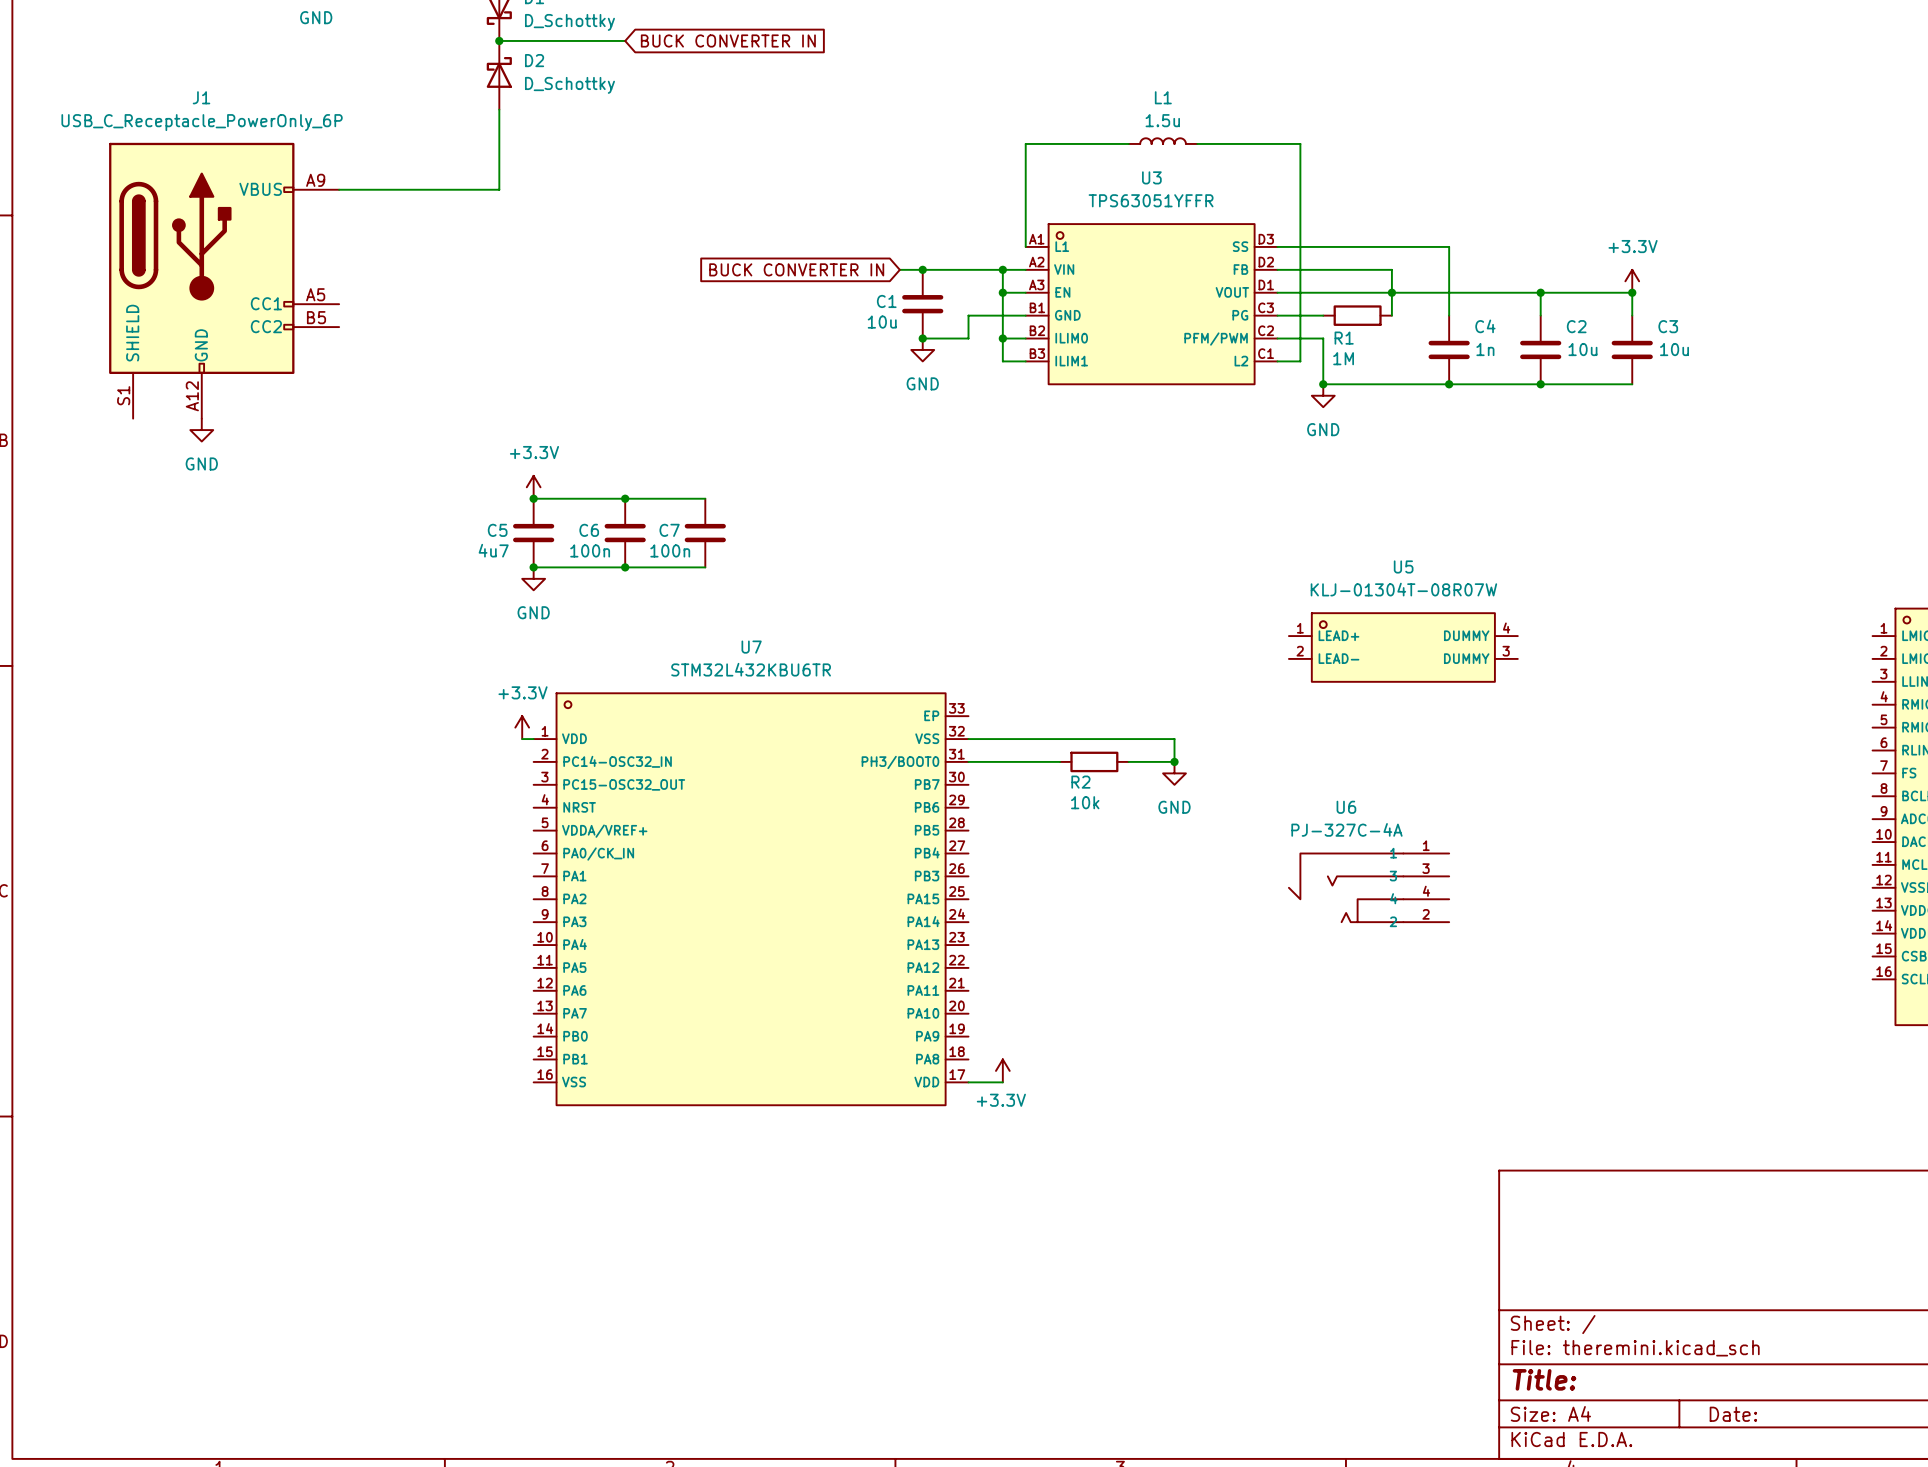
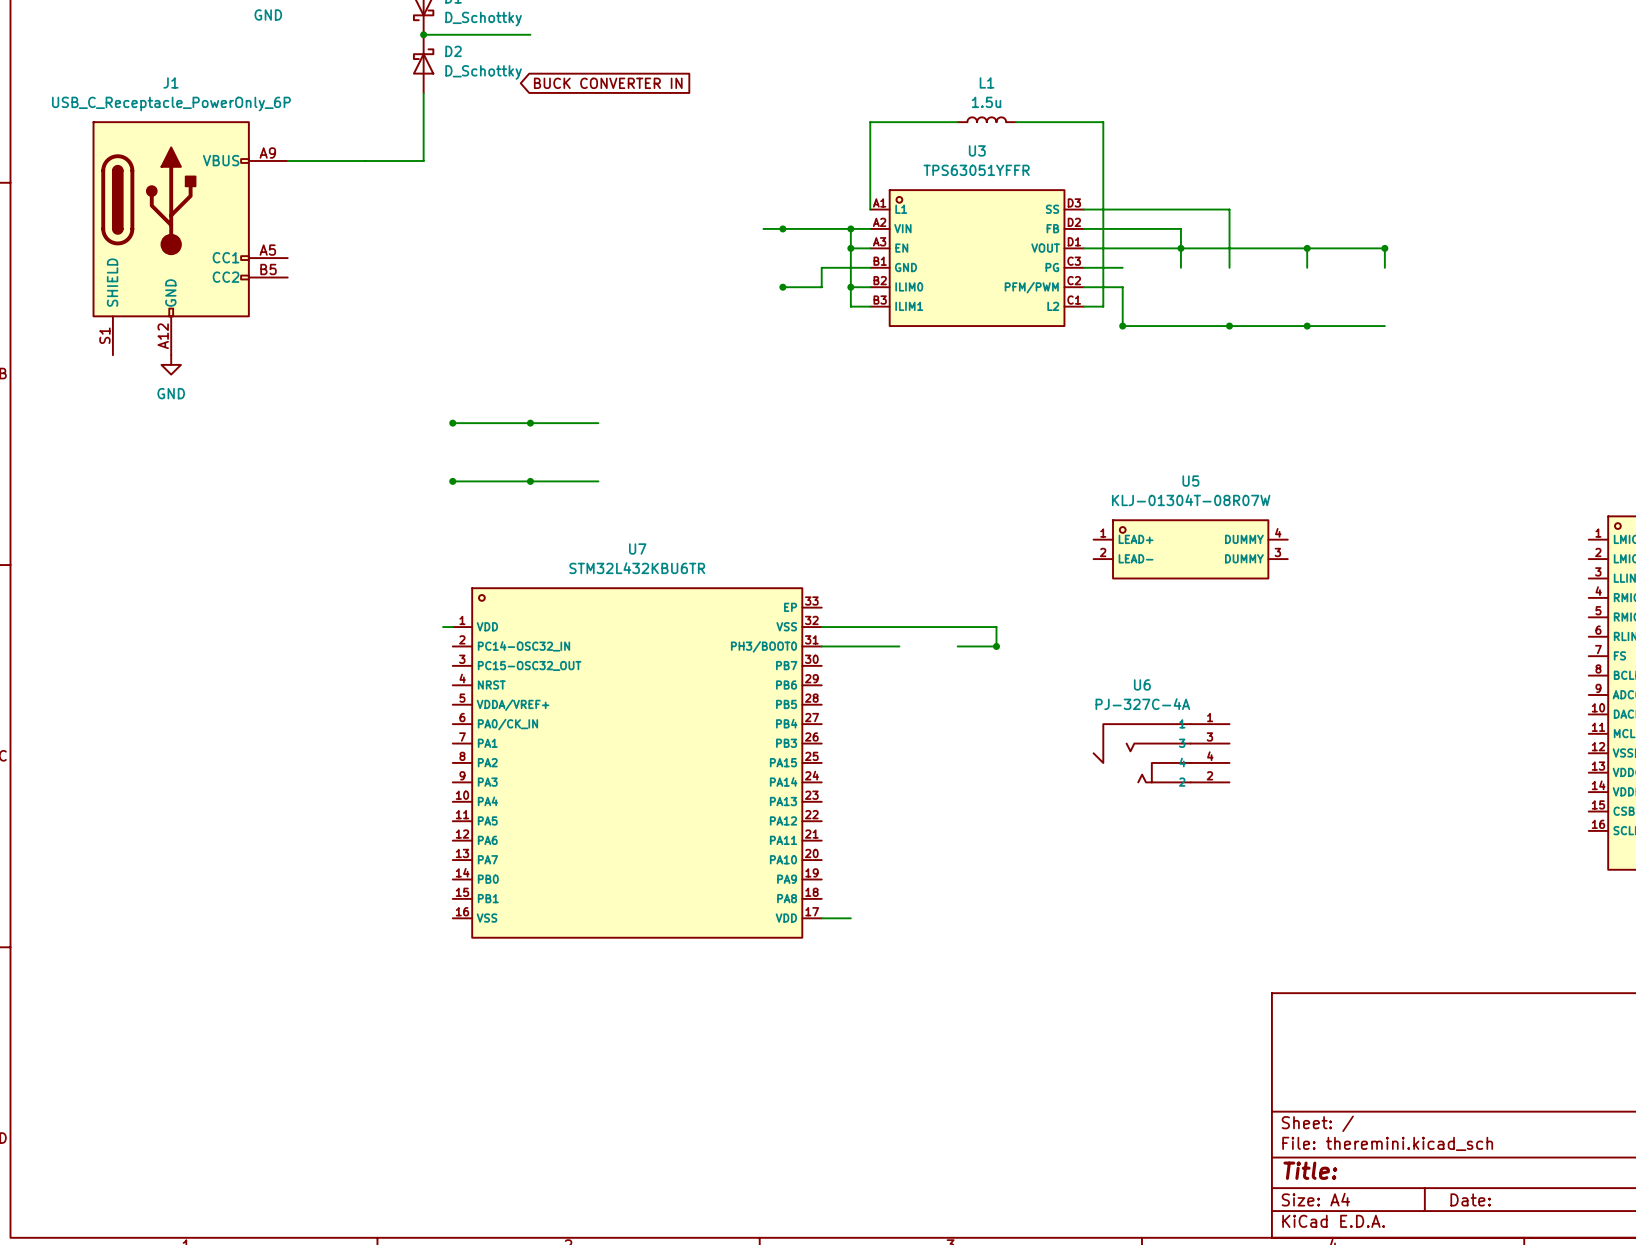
global label position: BUCK CONVERTER IN (728, 40) -> BUCK CONVERTER IN (608, 83)
global label: BUCK CONVERTER IN (796, 269) -> none
power symbol: +3.3V (1632, 281) -> none
C1: 10u (922, 304) -> none
R1: 1M (1357, 315) -> none
power symbol: GND (922, 349) -> none
C4: 1n (1449, 349) -> none
C2: 10u (1540, 349) -> none
C3: 10u (1632, 349) -> none
power symbol: GND (1323, 395) -> none
power symbol: +3.3V (533, 487) -> none
C5: 4u7 (533, 533) -> none
C6: 100n (625, 533) -> none
C7: 100n (705, 533) -> none
power symbol: GND (533, 578) -> none
power symbol: +3.3V (522, 727) -> none
R2: 10k (1094, 761) -> none
power symbol: GND (1174, 773) -> none
power symbol: +3.3V (1002, 1070) -> none

